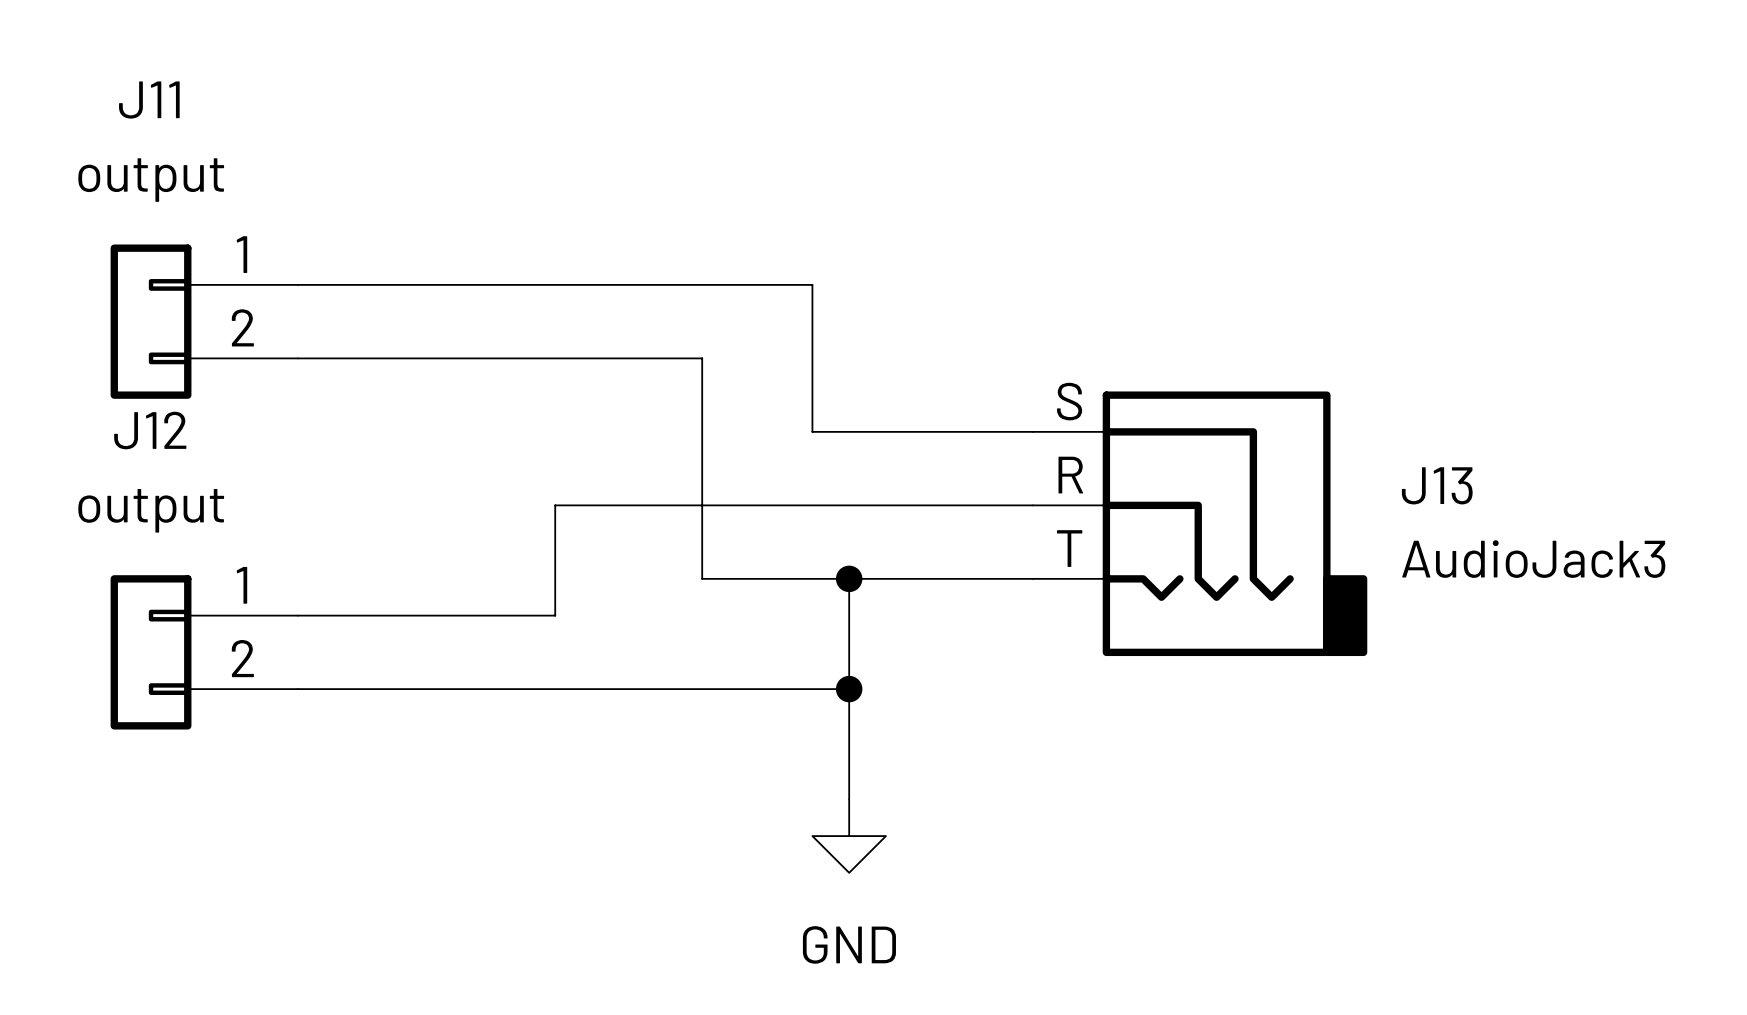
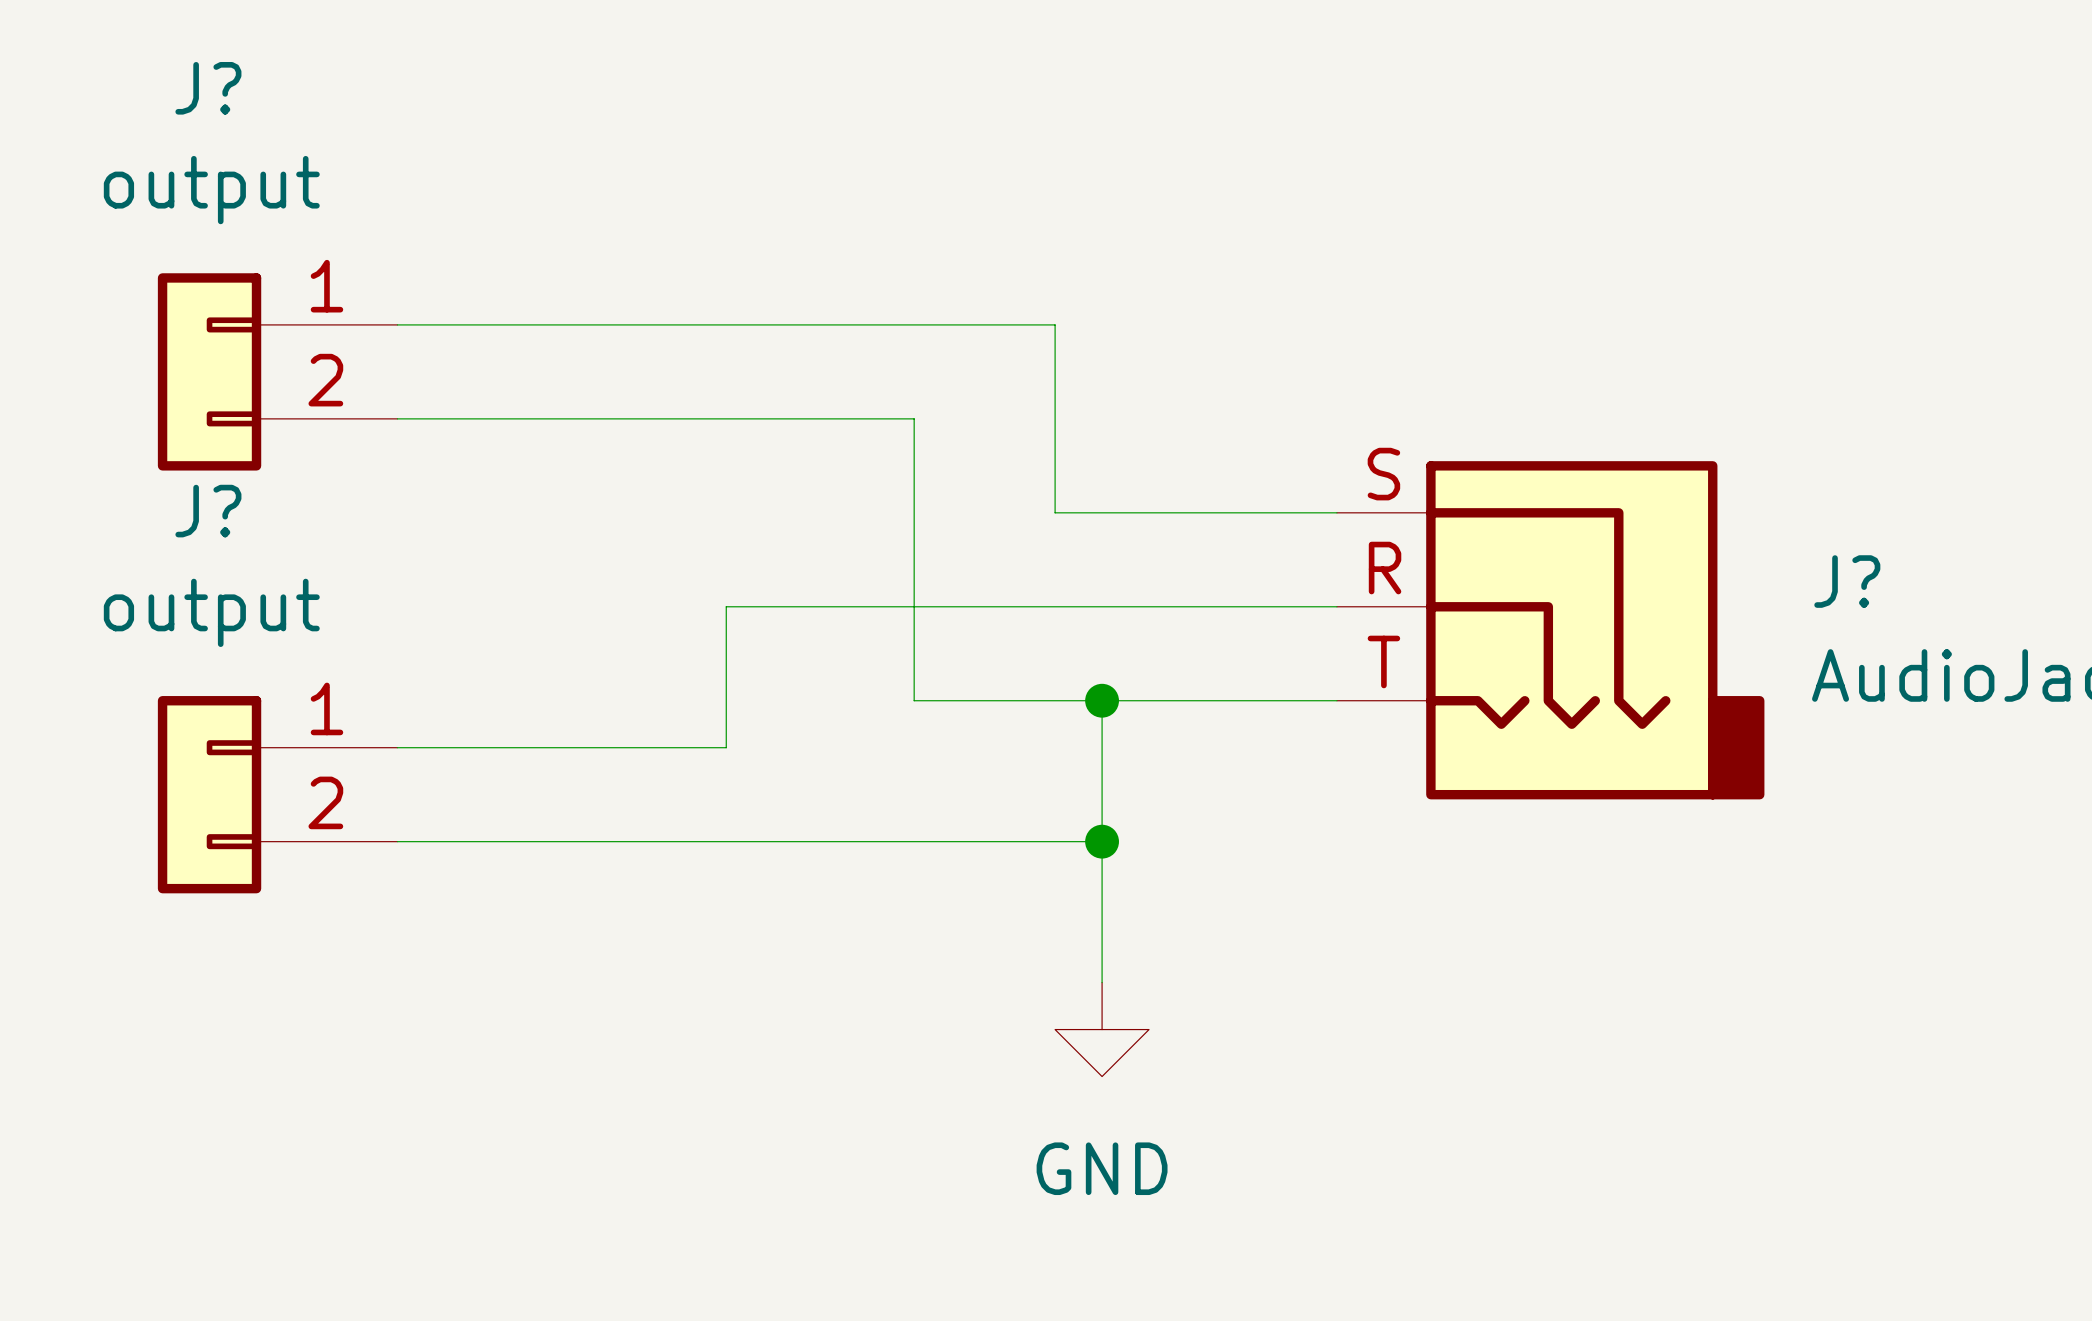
J11 name: J11 (149, 100) -> J? (208, 88)
J12 name: J12 (150, 430) -> J? (208, 511)
J13 name: J13 (1437, 485) -> J? (1847, 581)

